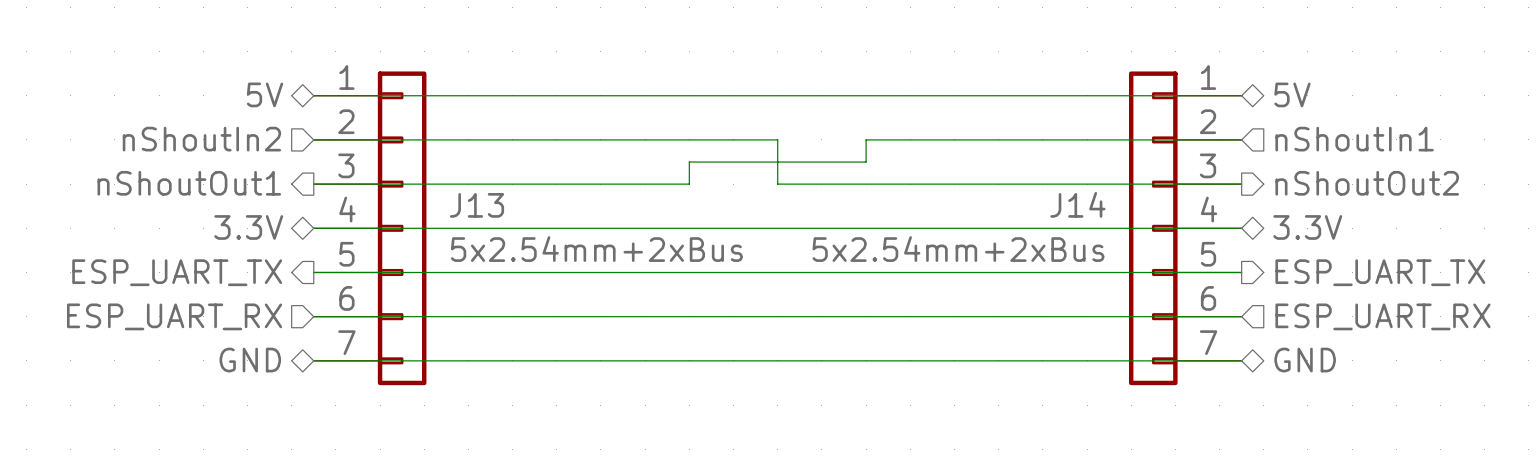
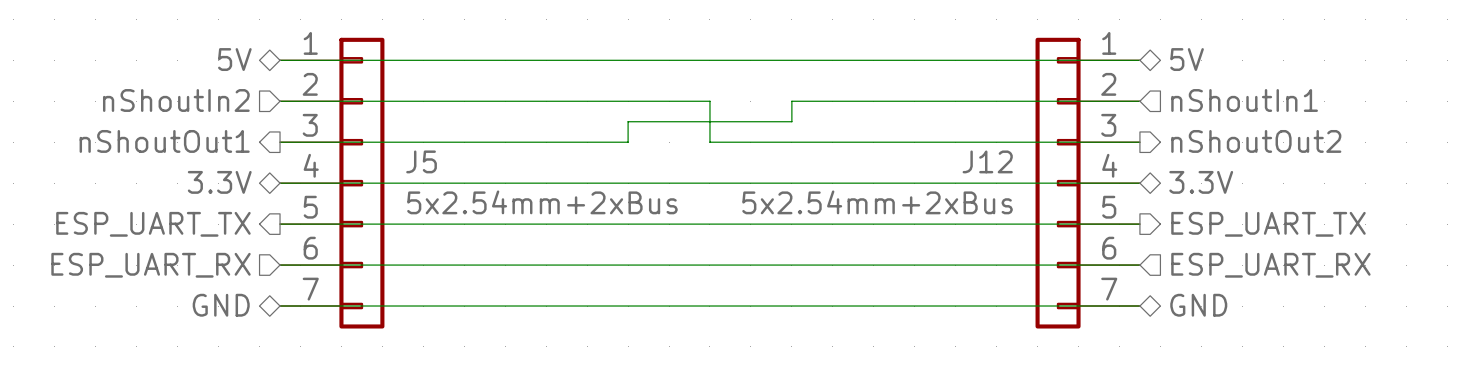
J14 name: J14 (1077, 204) -> J12 (987, 161)
J13 name: J13 (477, 205) -> J5 (421, 161)

